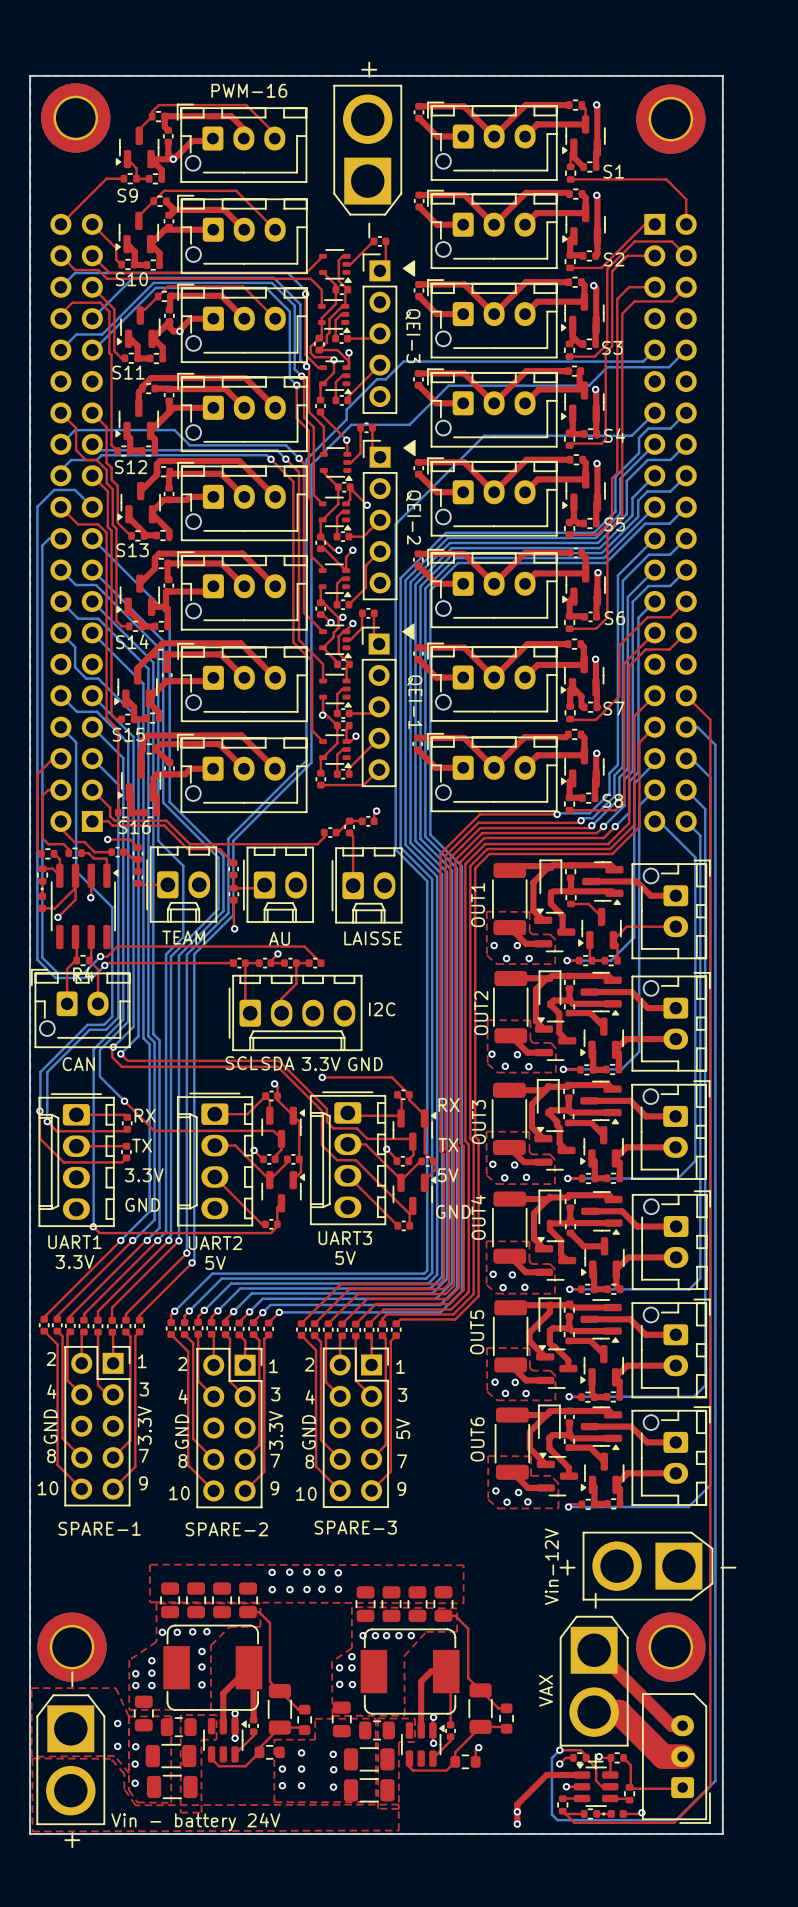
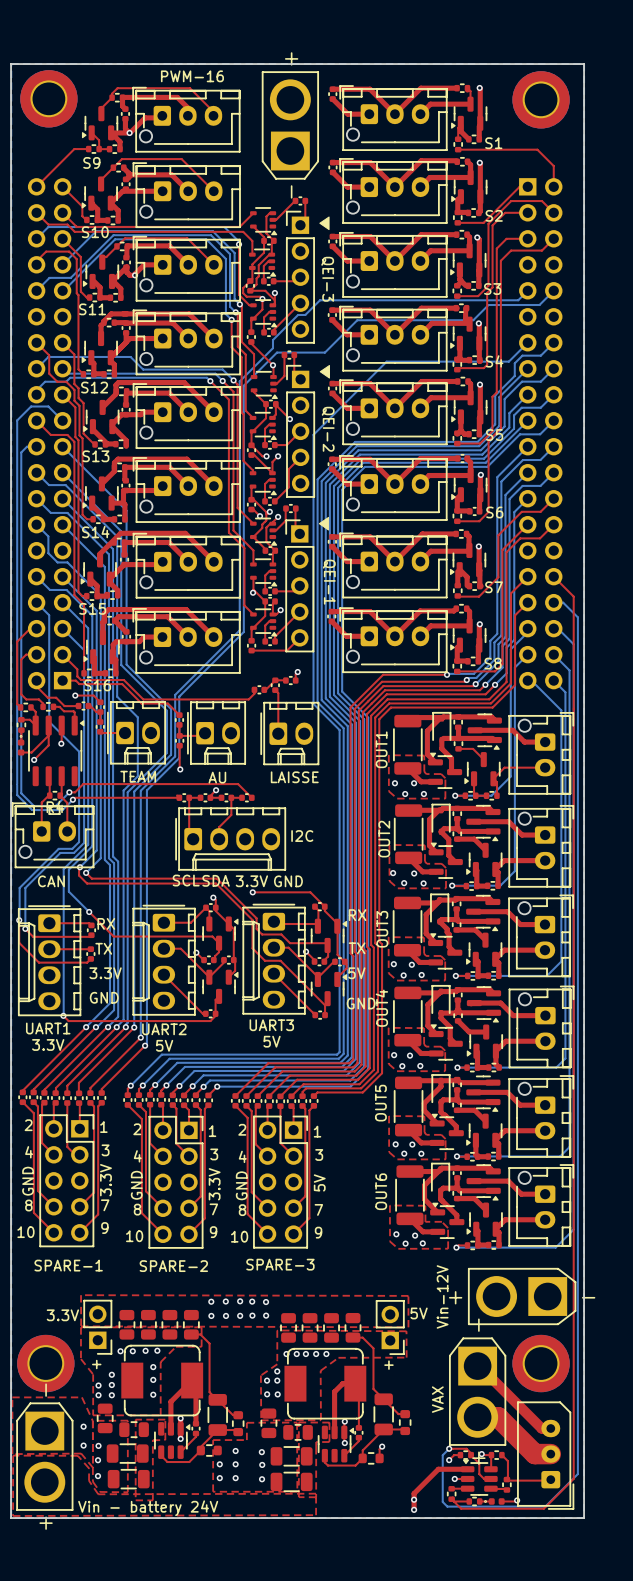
top zone outline: (149, 1564) (463, 1565) (463, 1603) (150, 1602) (149, 1564) -> (81, 1295) (81, 1326) (408, 1327) (408, 1295) (81, 1295)
text: none -> 5V (419, 1313)
text: none -> 3.3V (62, 1315)
part: none -> (97, 1327)
top zone outline: (156, 1603) (156, 1641) (129, 1660) -> (115, 1327) (80, 1327) (80, 1359) (93, 1374)
part: none -> (390, 1327)
top zone outline: (351, 1607) (457, 1608) (457, 1631) (426, 1631) (404, 1655) -> (277, 1330) (406, 1331) (406, 1357) (338, 1357) (320, 1370)
text: none -> + (96, 1364)
text: none -> + (388, 1365)

